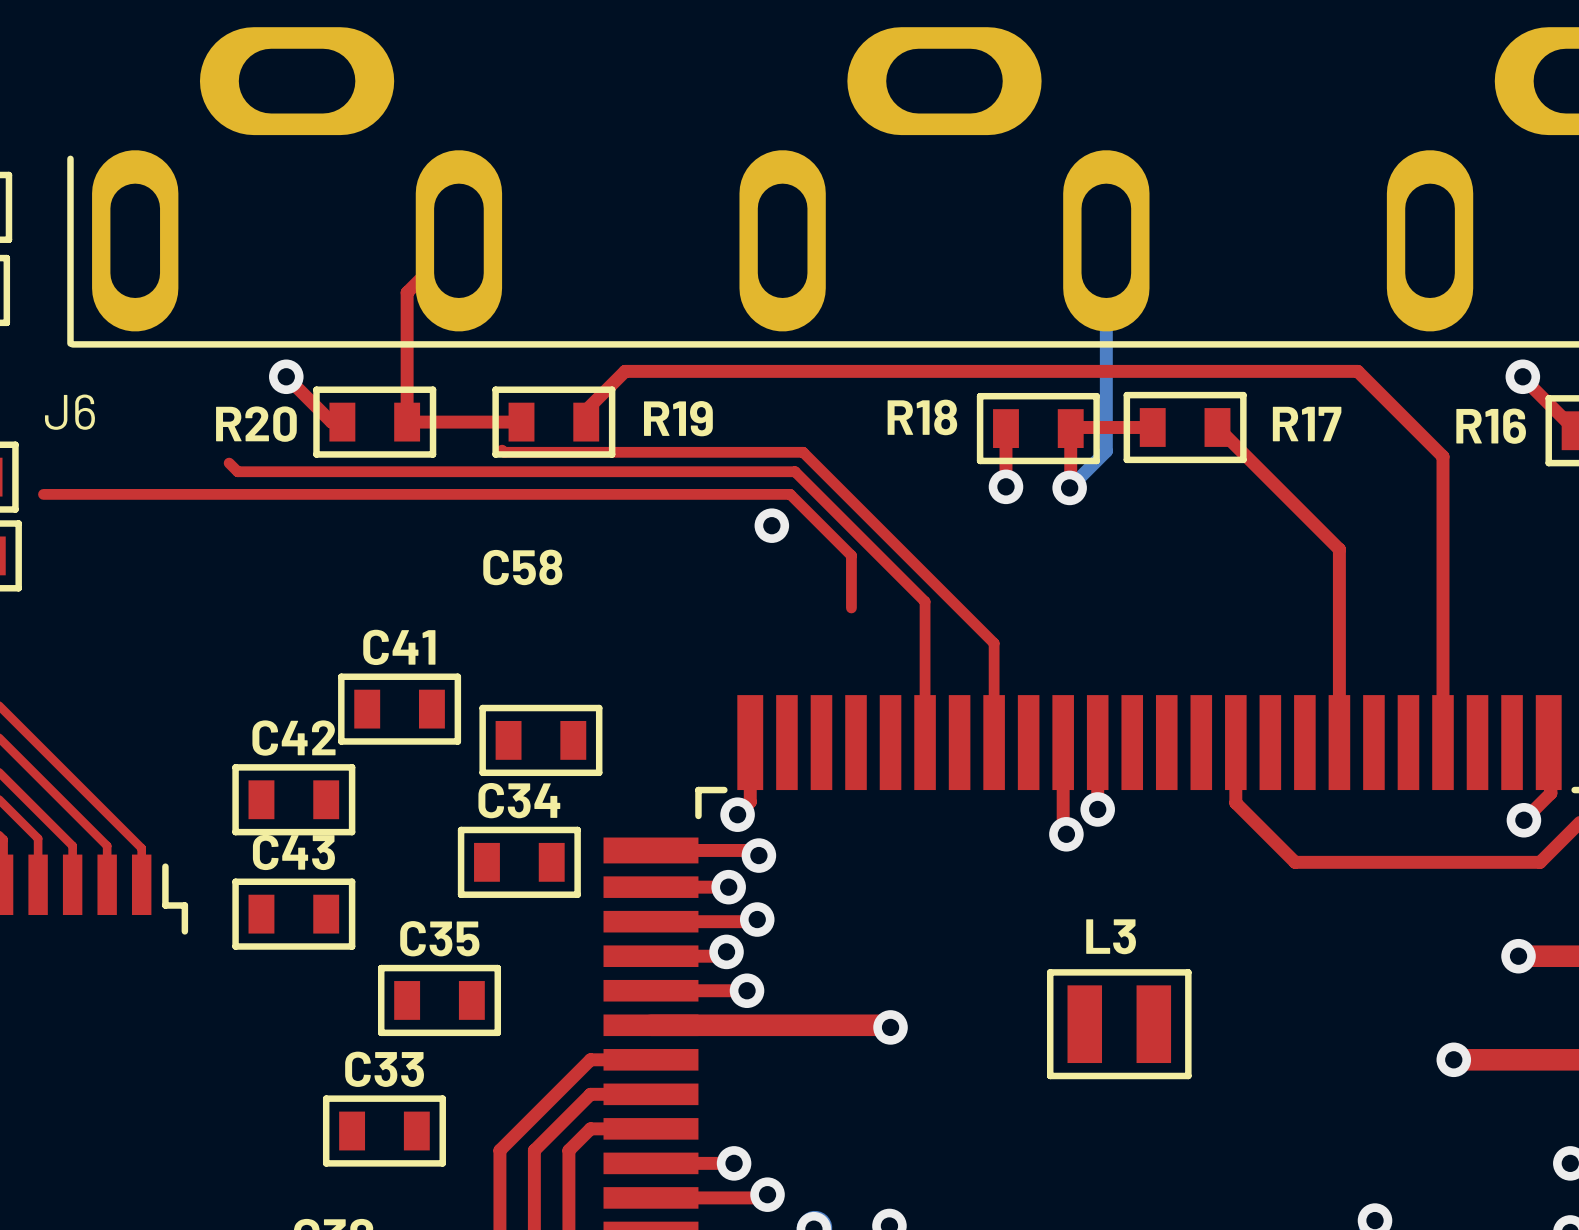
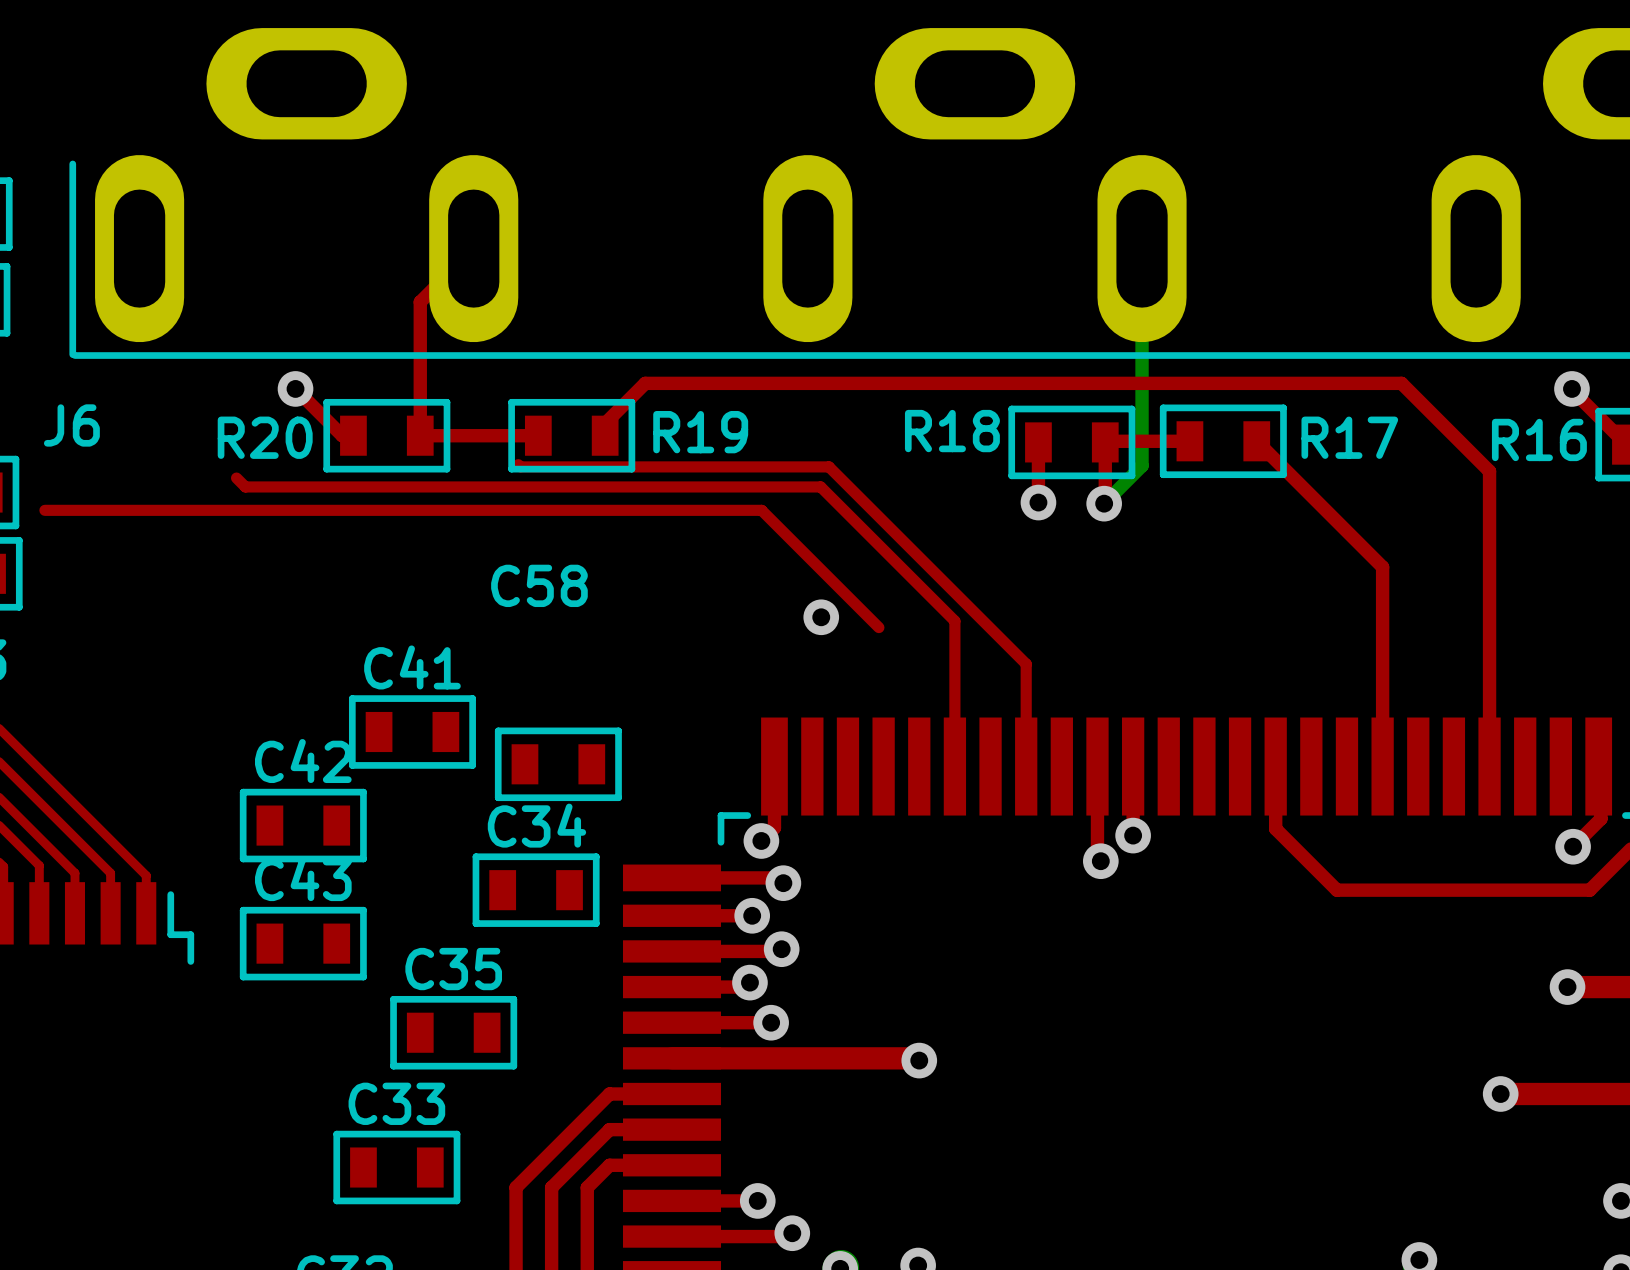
top track: (737, 494) (790, 494) (851, 555) (851, 607) -> (761, 510) (878, 627)
via position: (771, 525) -> (821, 617)
L3: (1119, 1024) -> none

